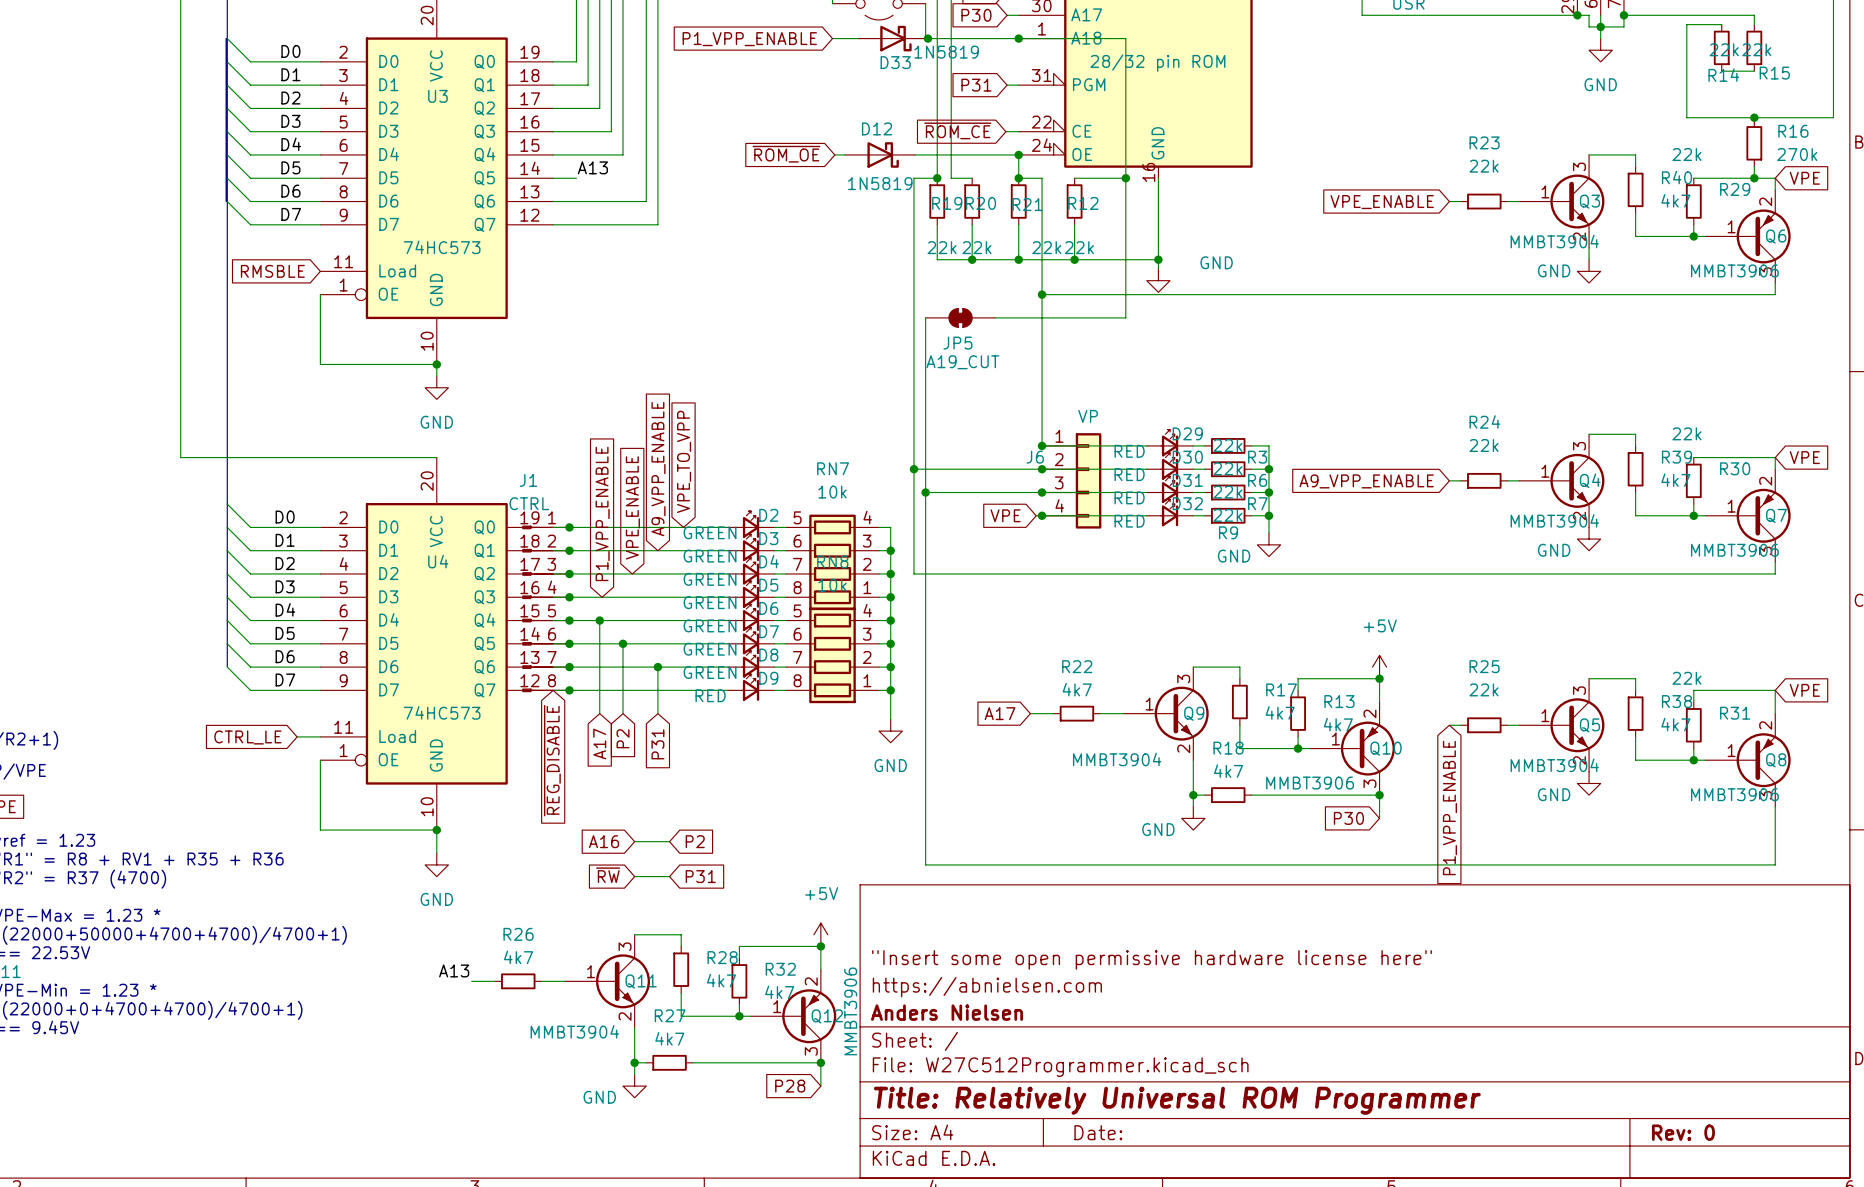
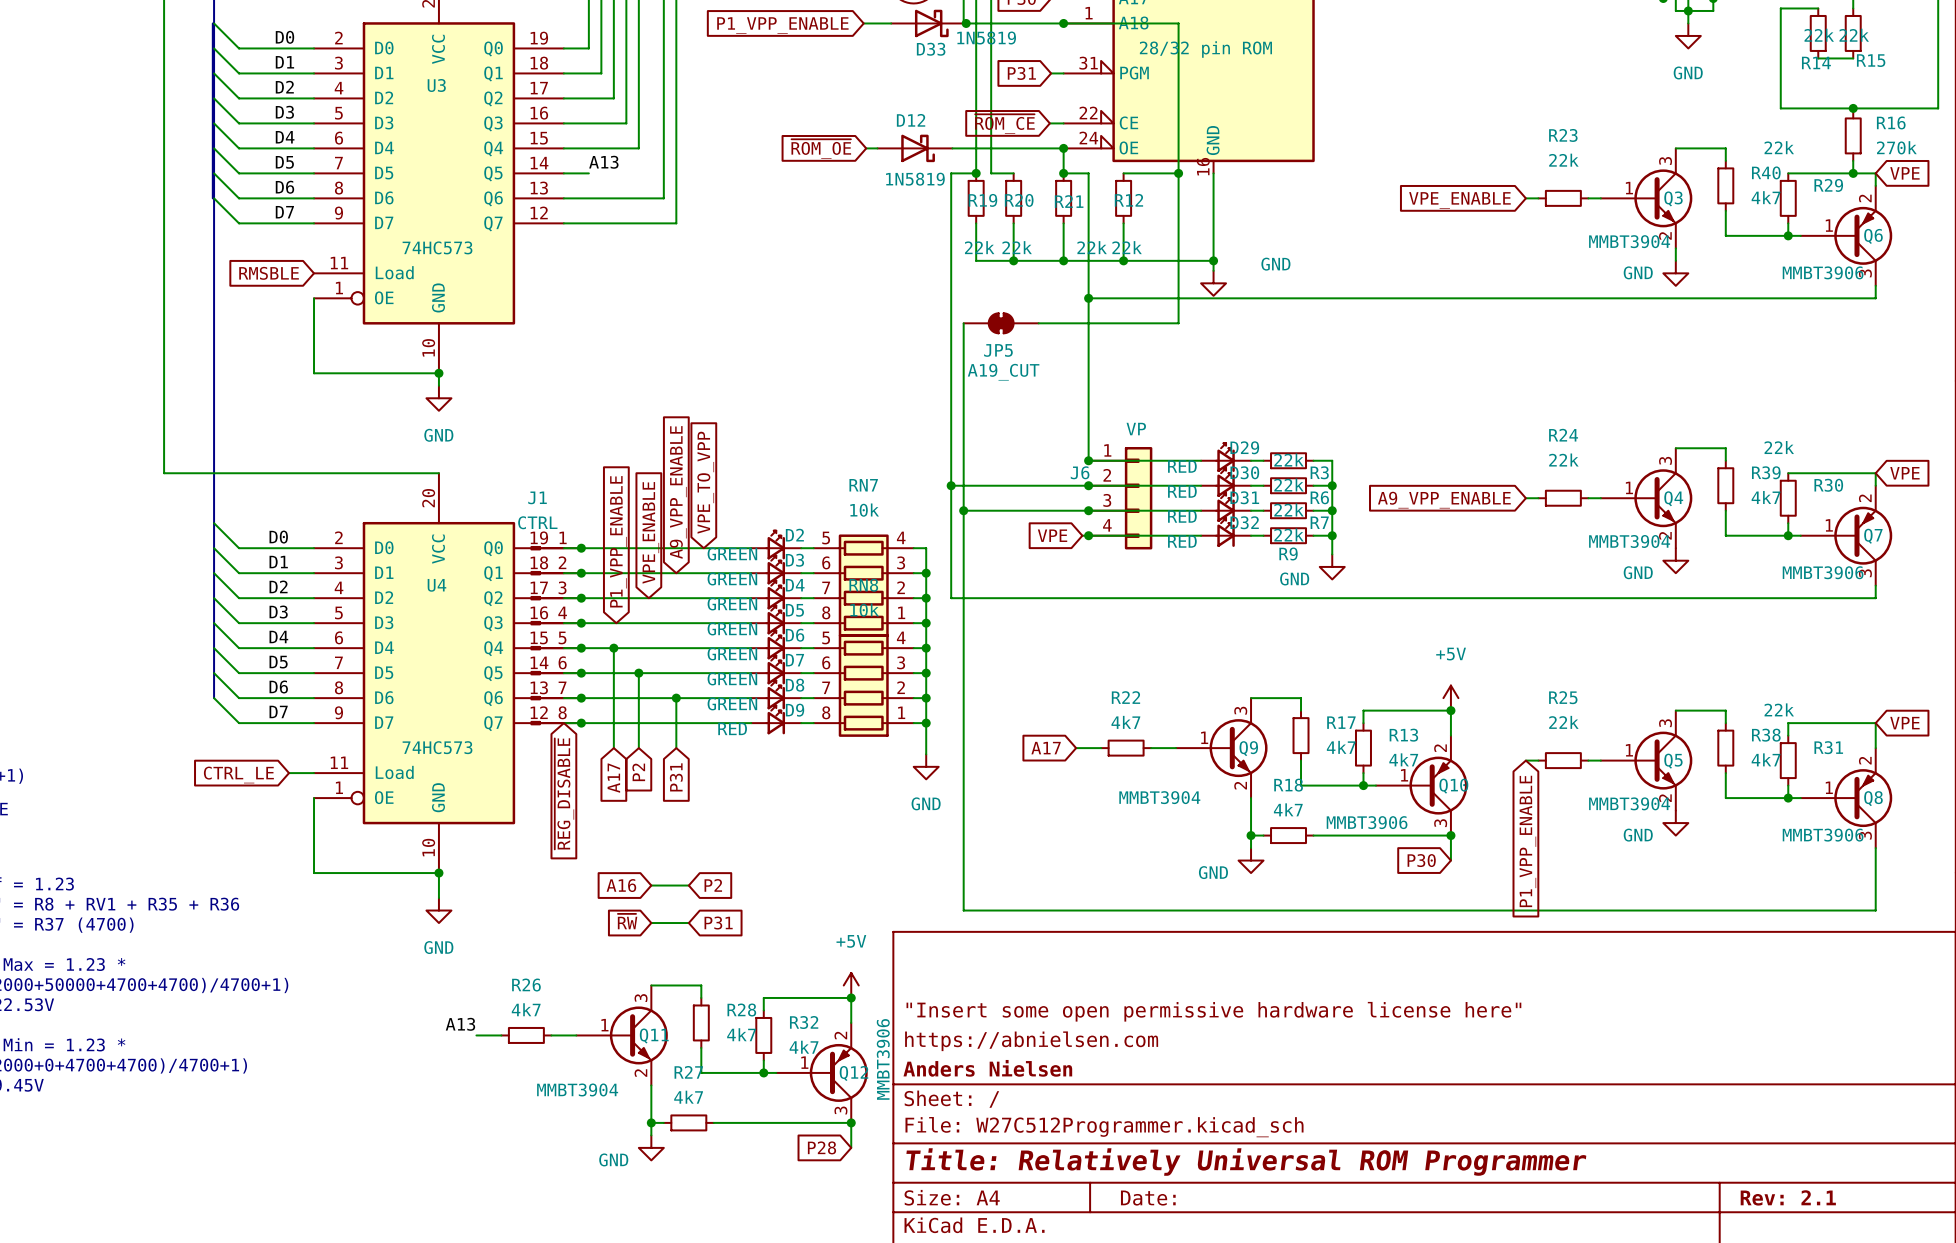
title block: Rev: 0 (1683, 1132) -> Rev: 2.1 (1788, 1197)

